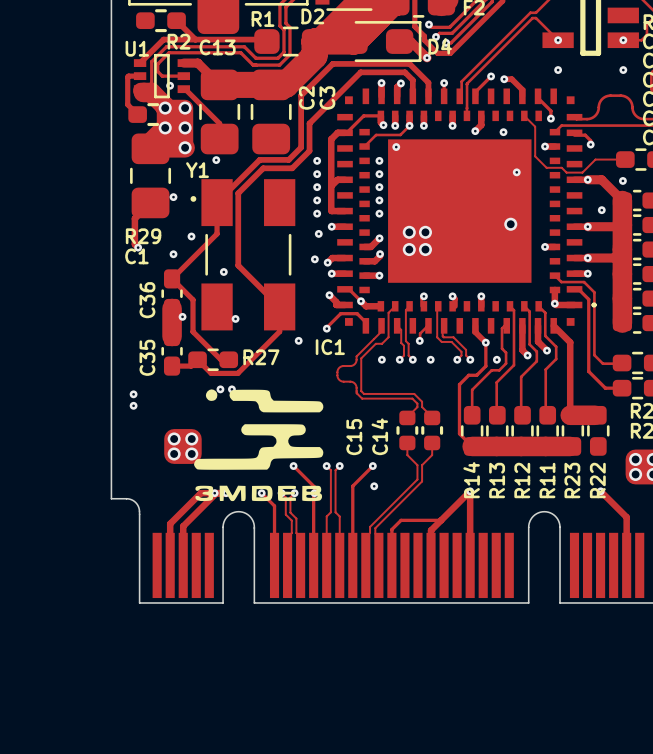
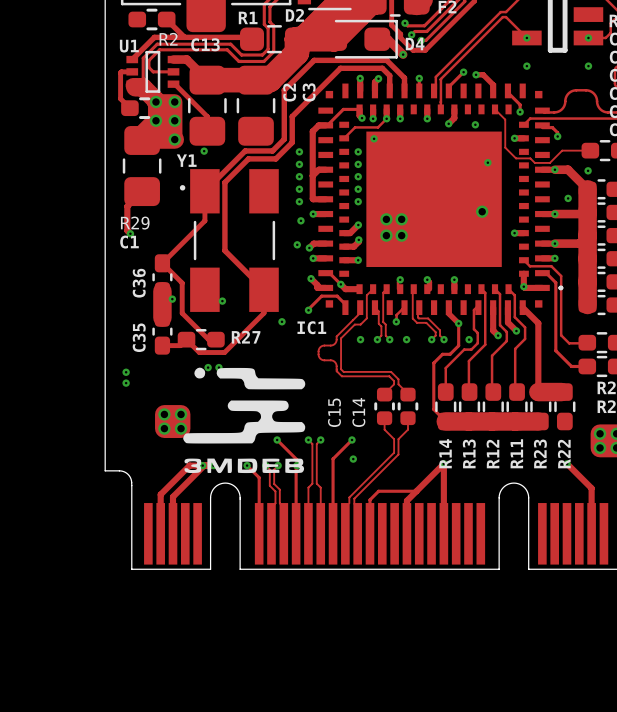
via: (170, 85) -> none
via: (173, 197) -> none
via: (191, 236) -> none
via: (173, 254) -> none
via: (223, 271) -> none

